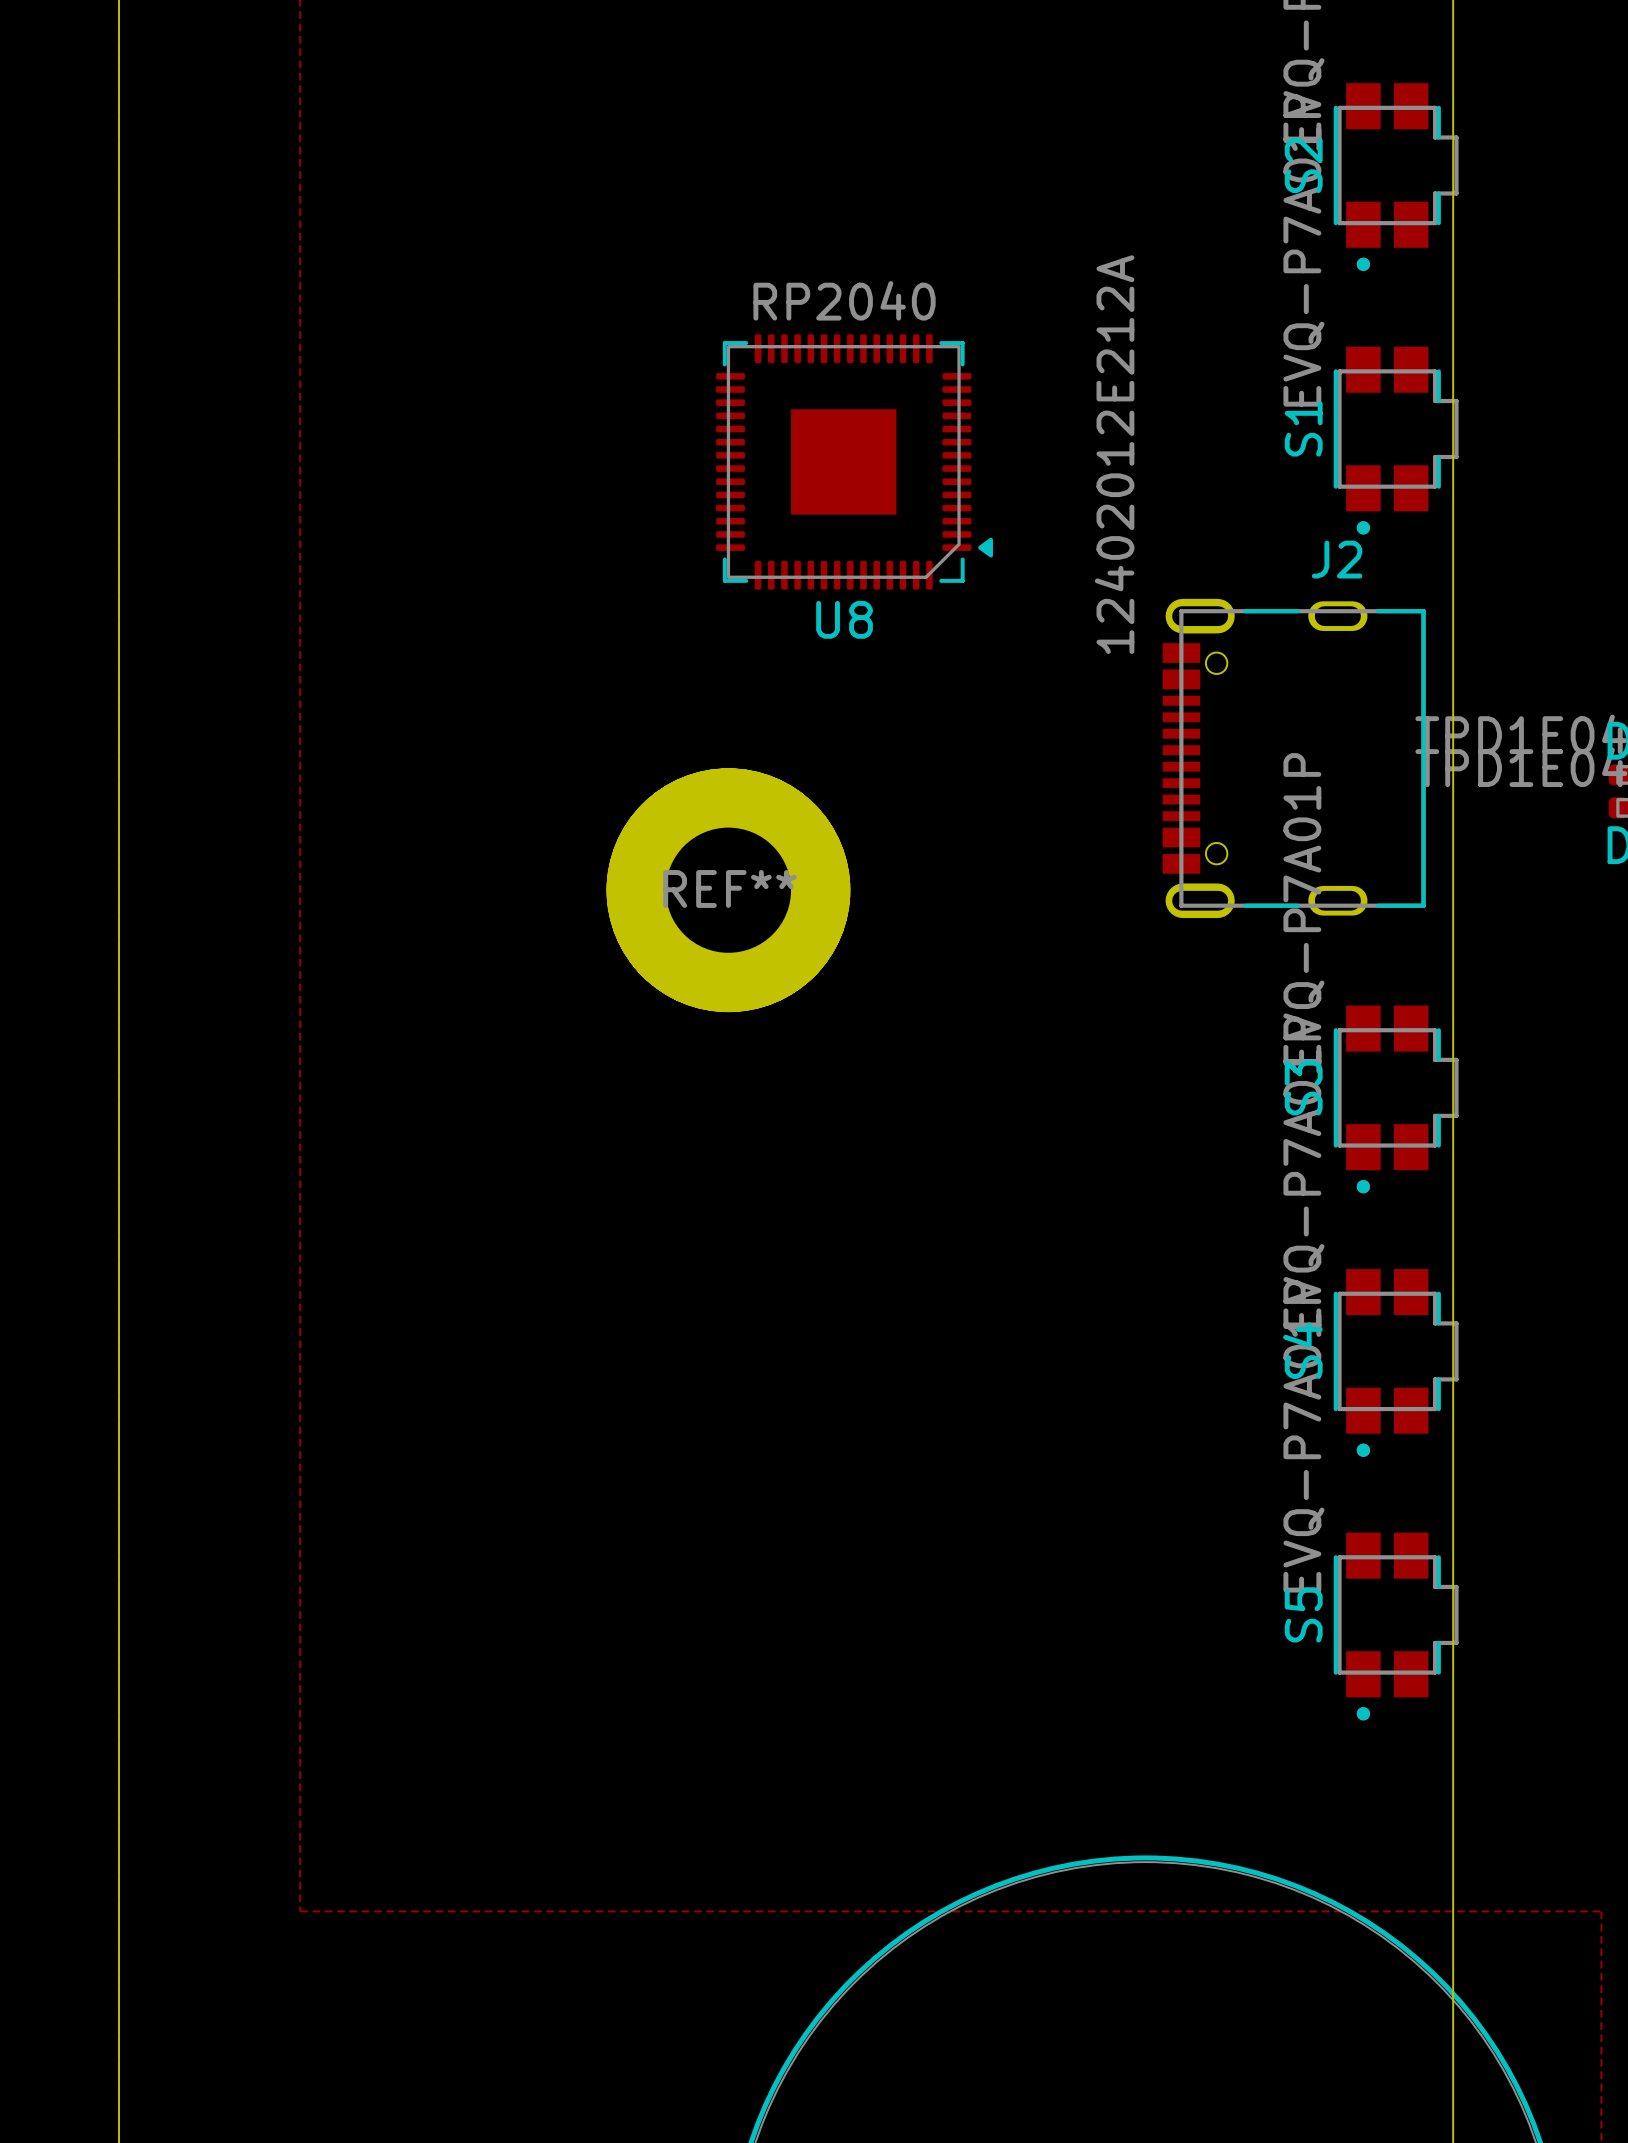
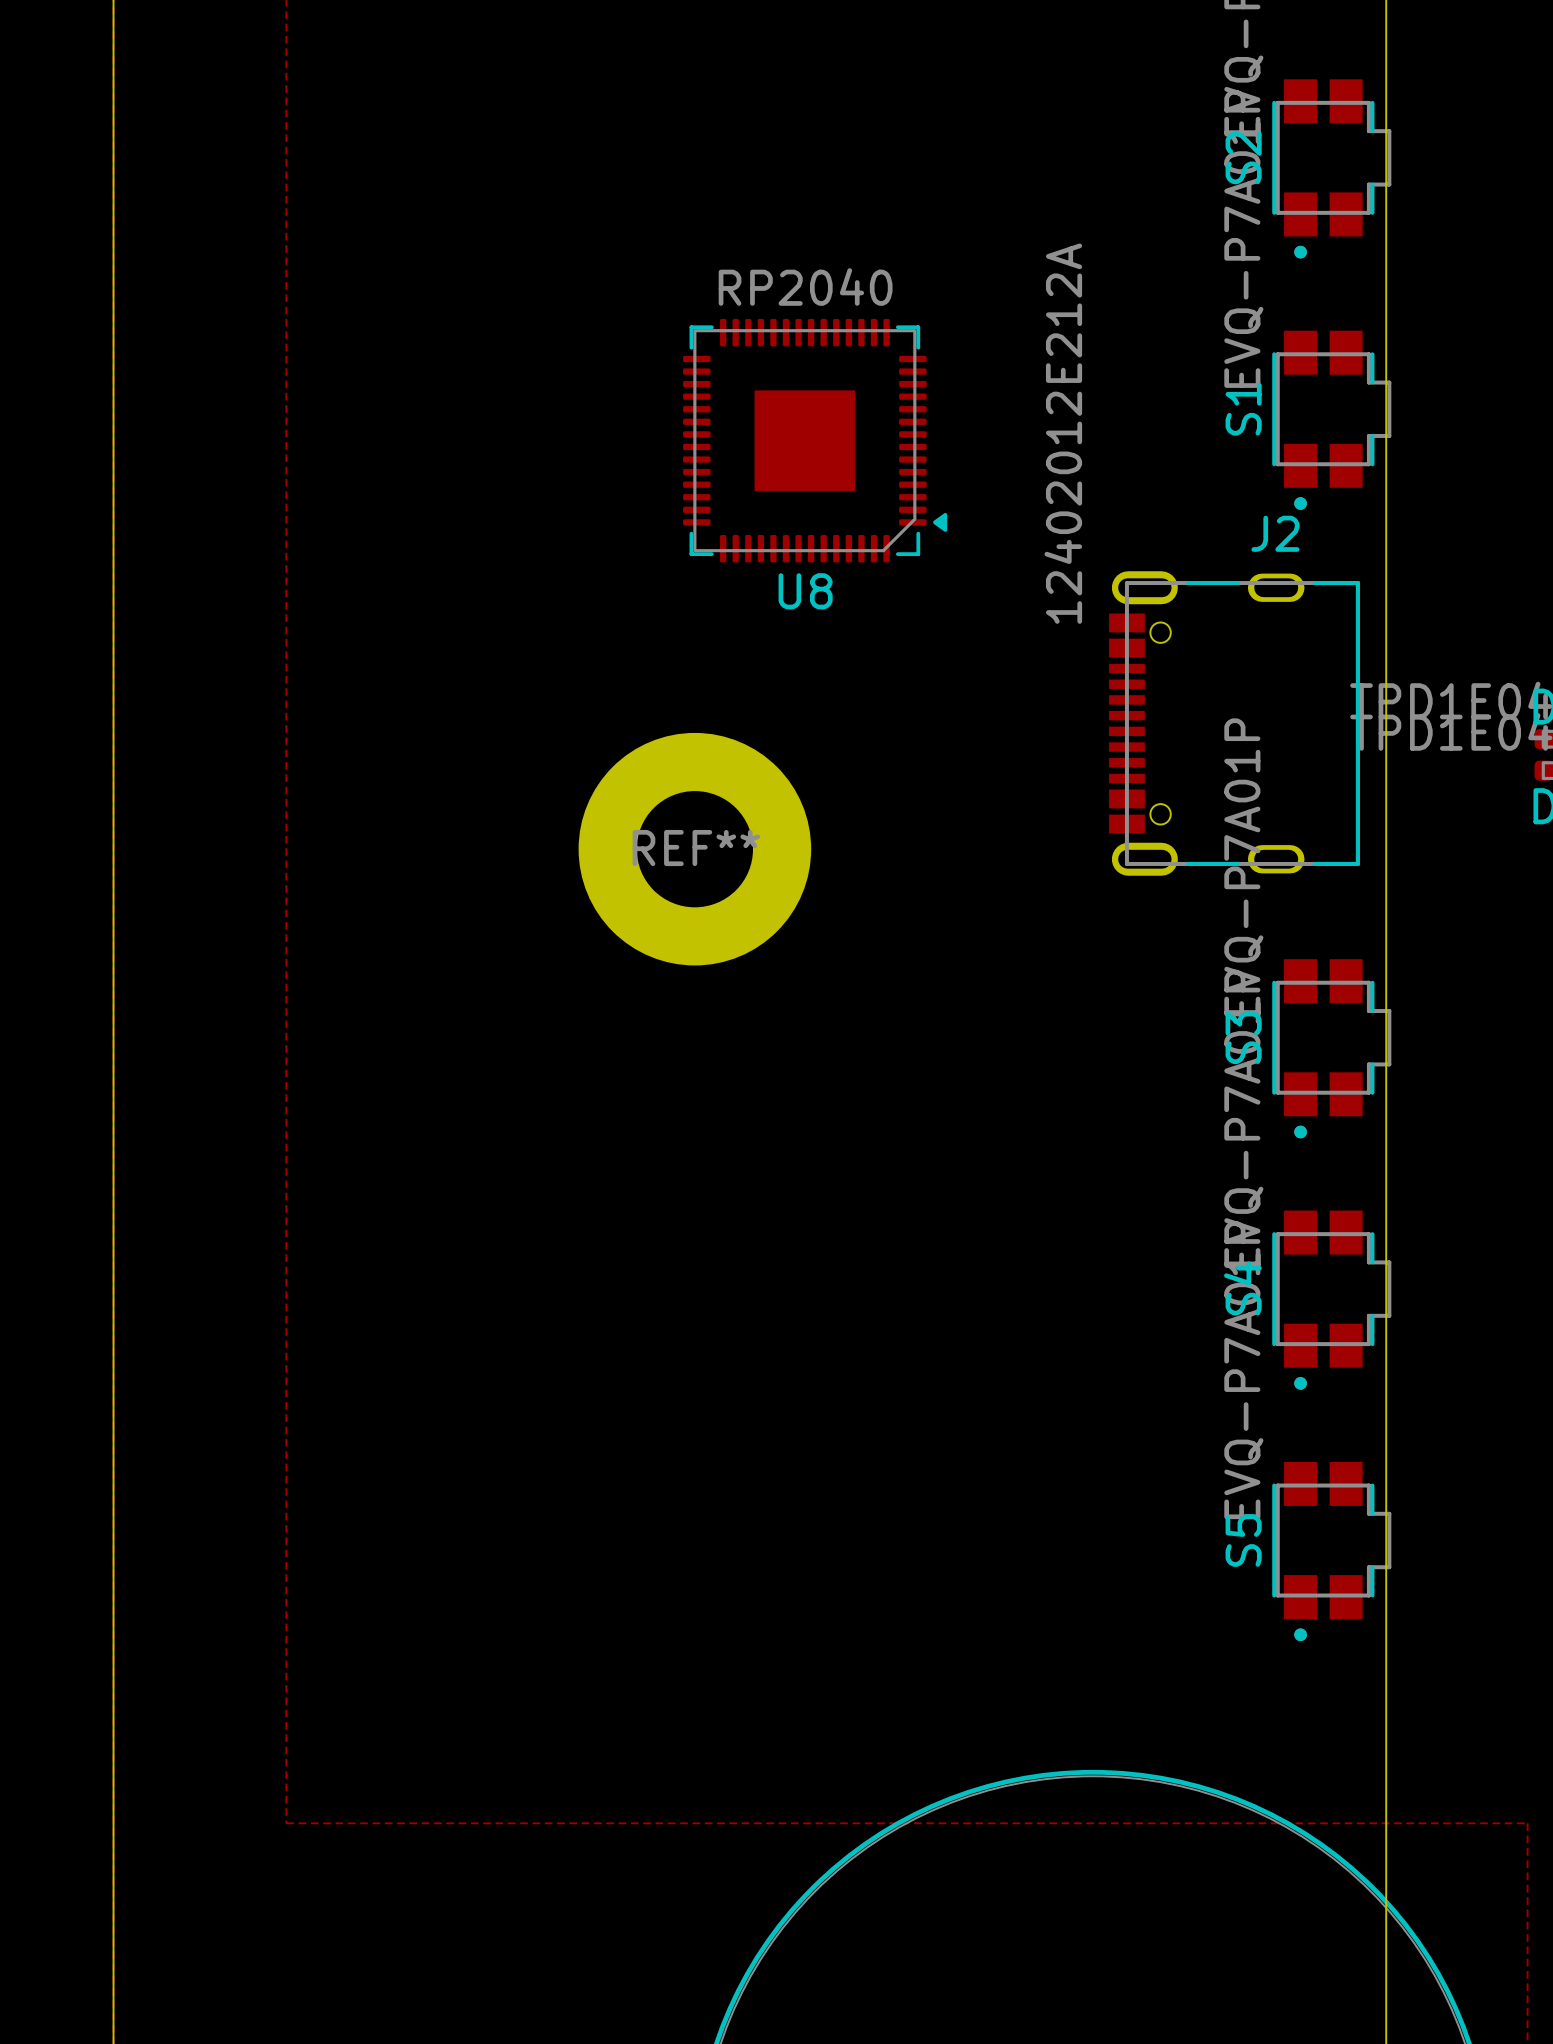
part: (728, 890) -> none

